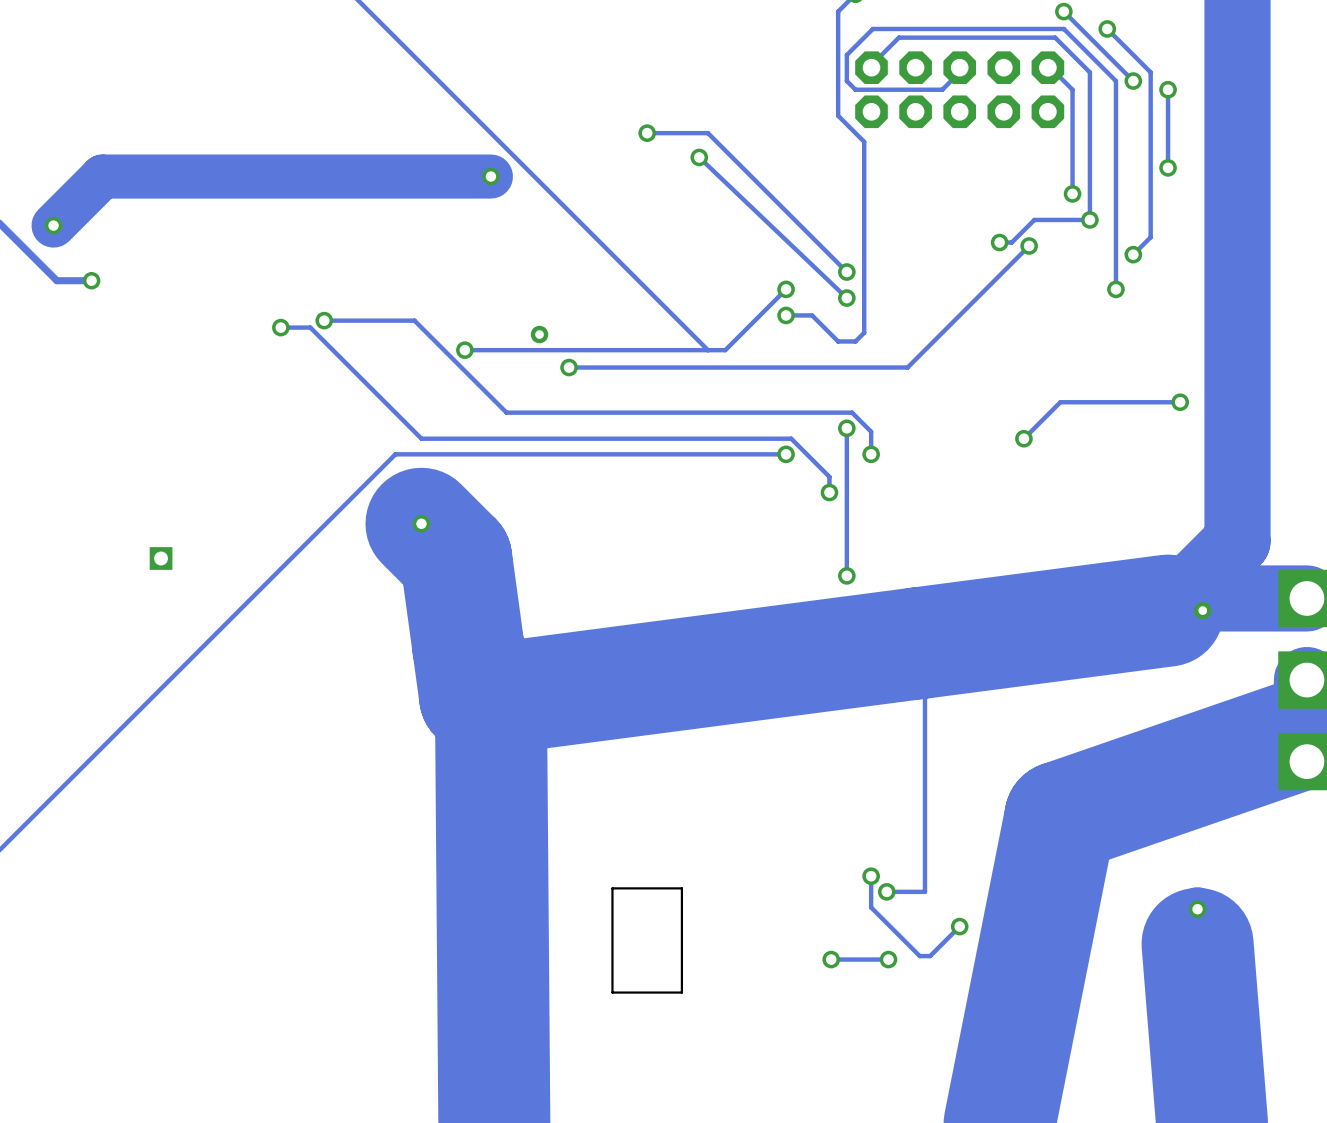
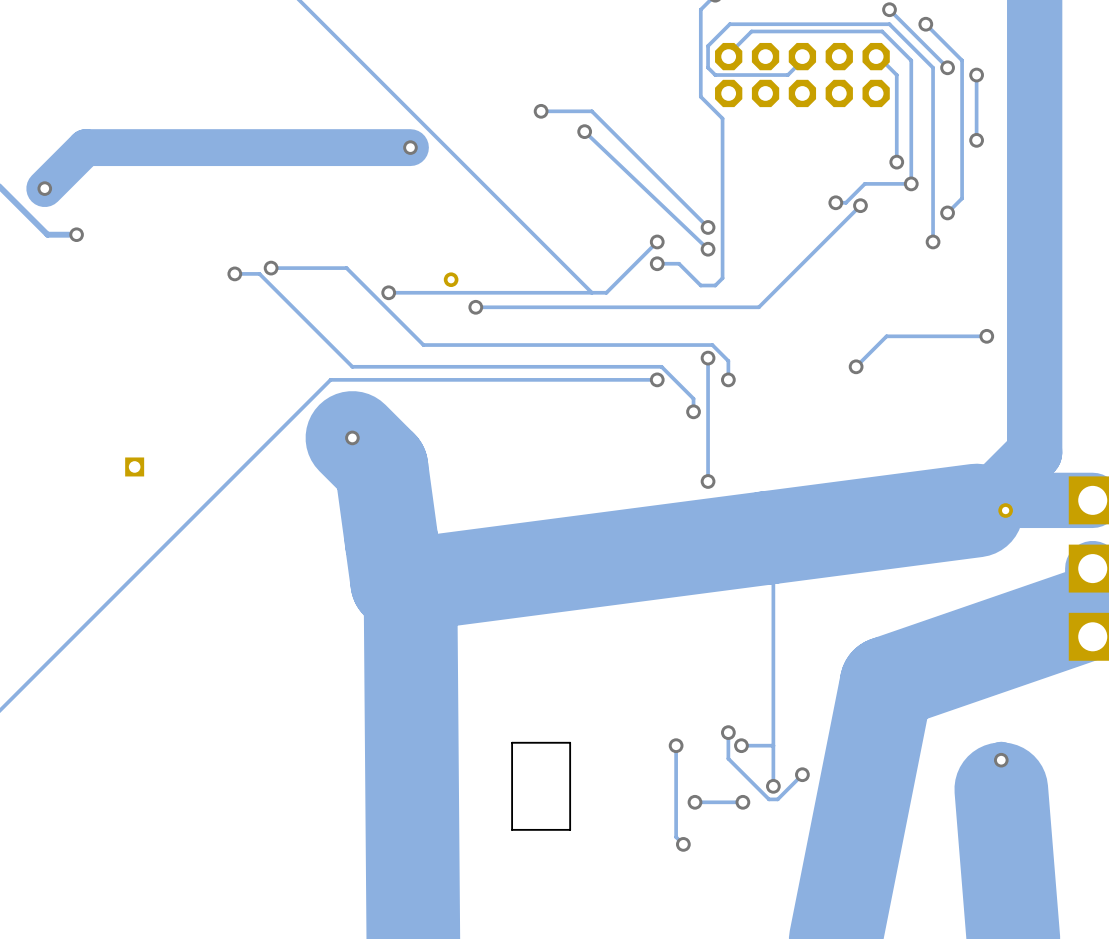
track: none -> (676, 745) (676, 837) (683, 844)
via: none -> (676, 745)
track: none -> (773, 745) (773, 786)
via: none -> (773, 786)
via: none -> (683, 844)

